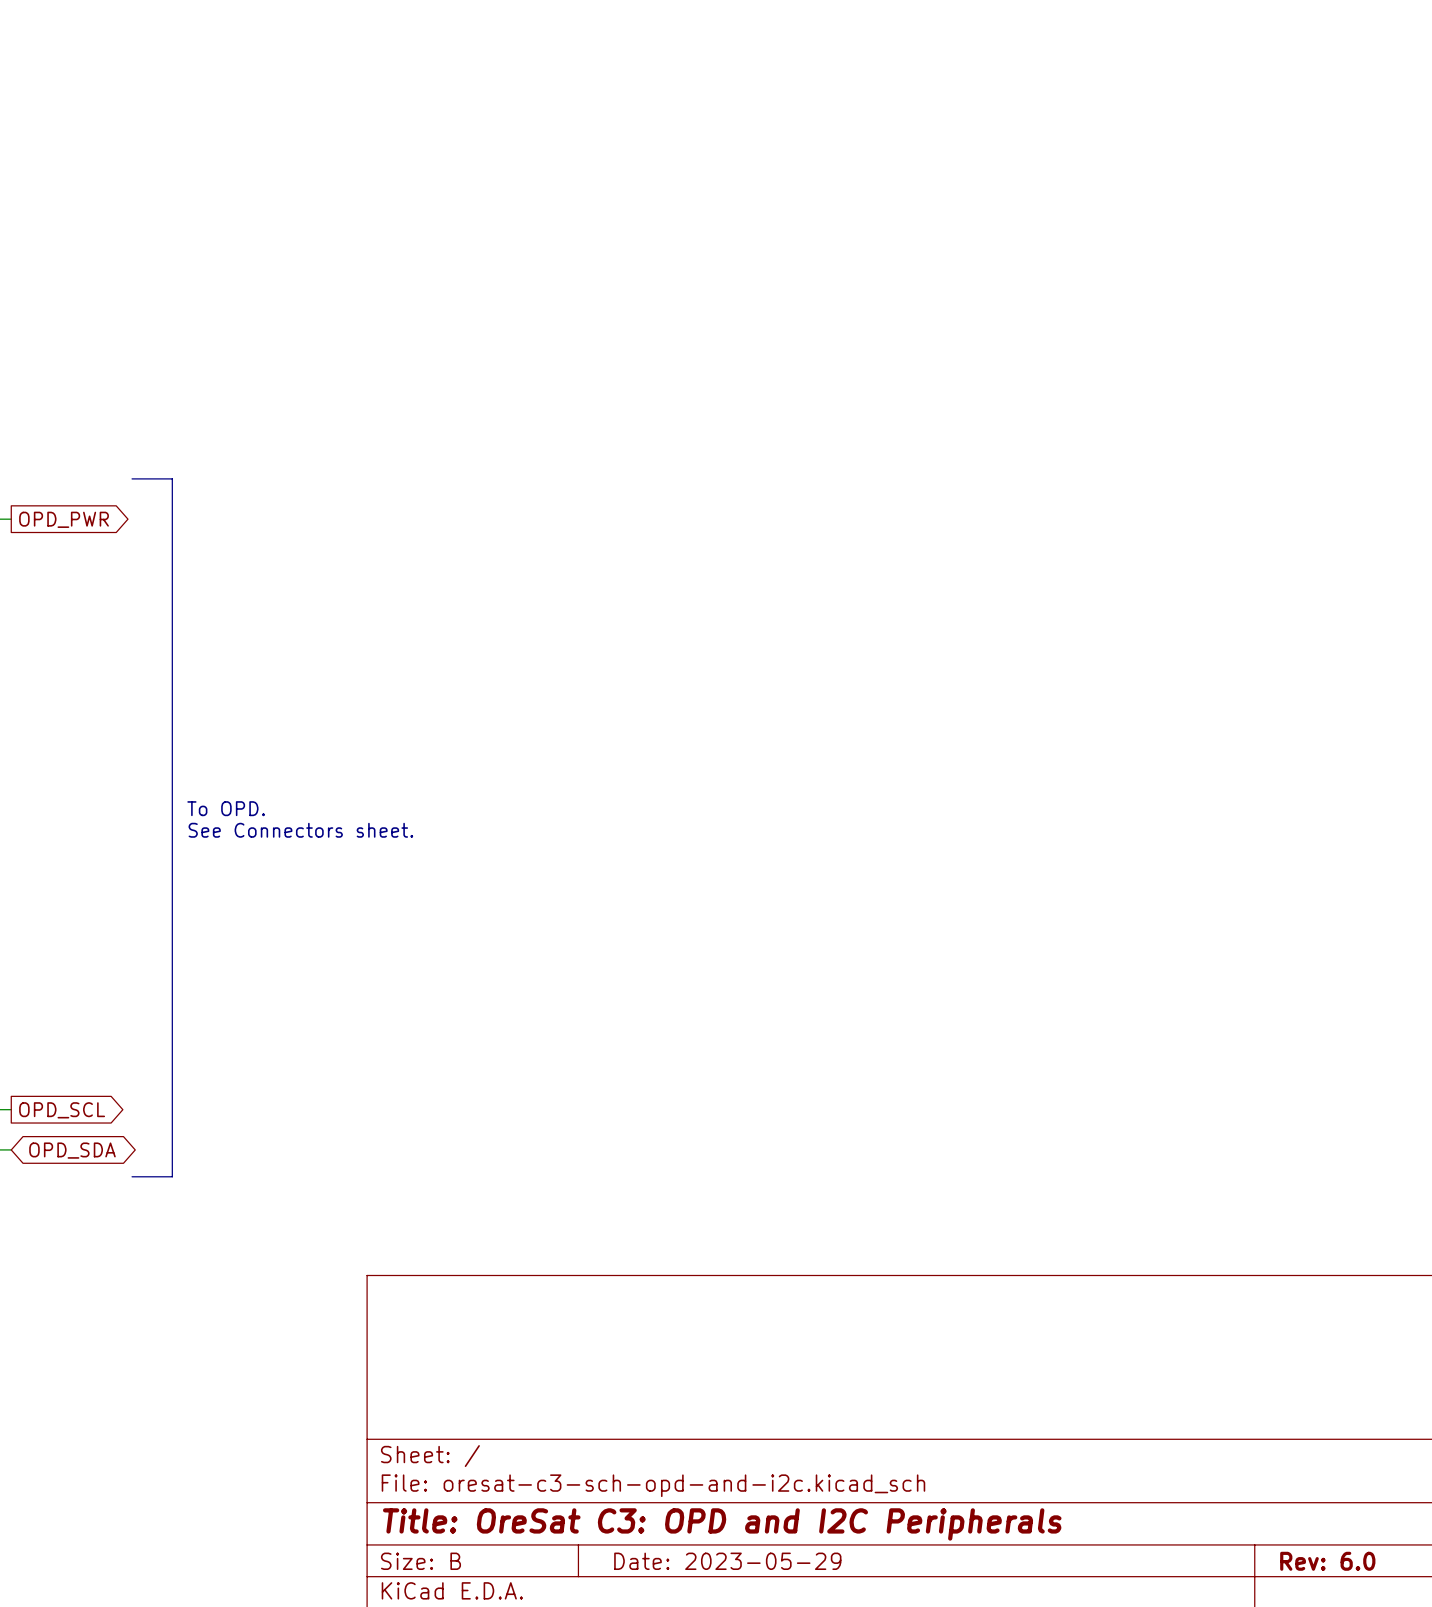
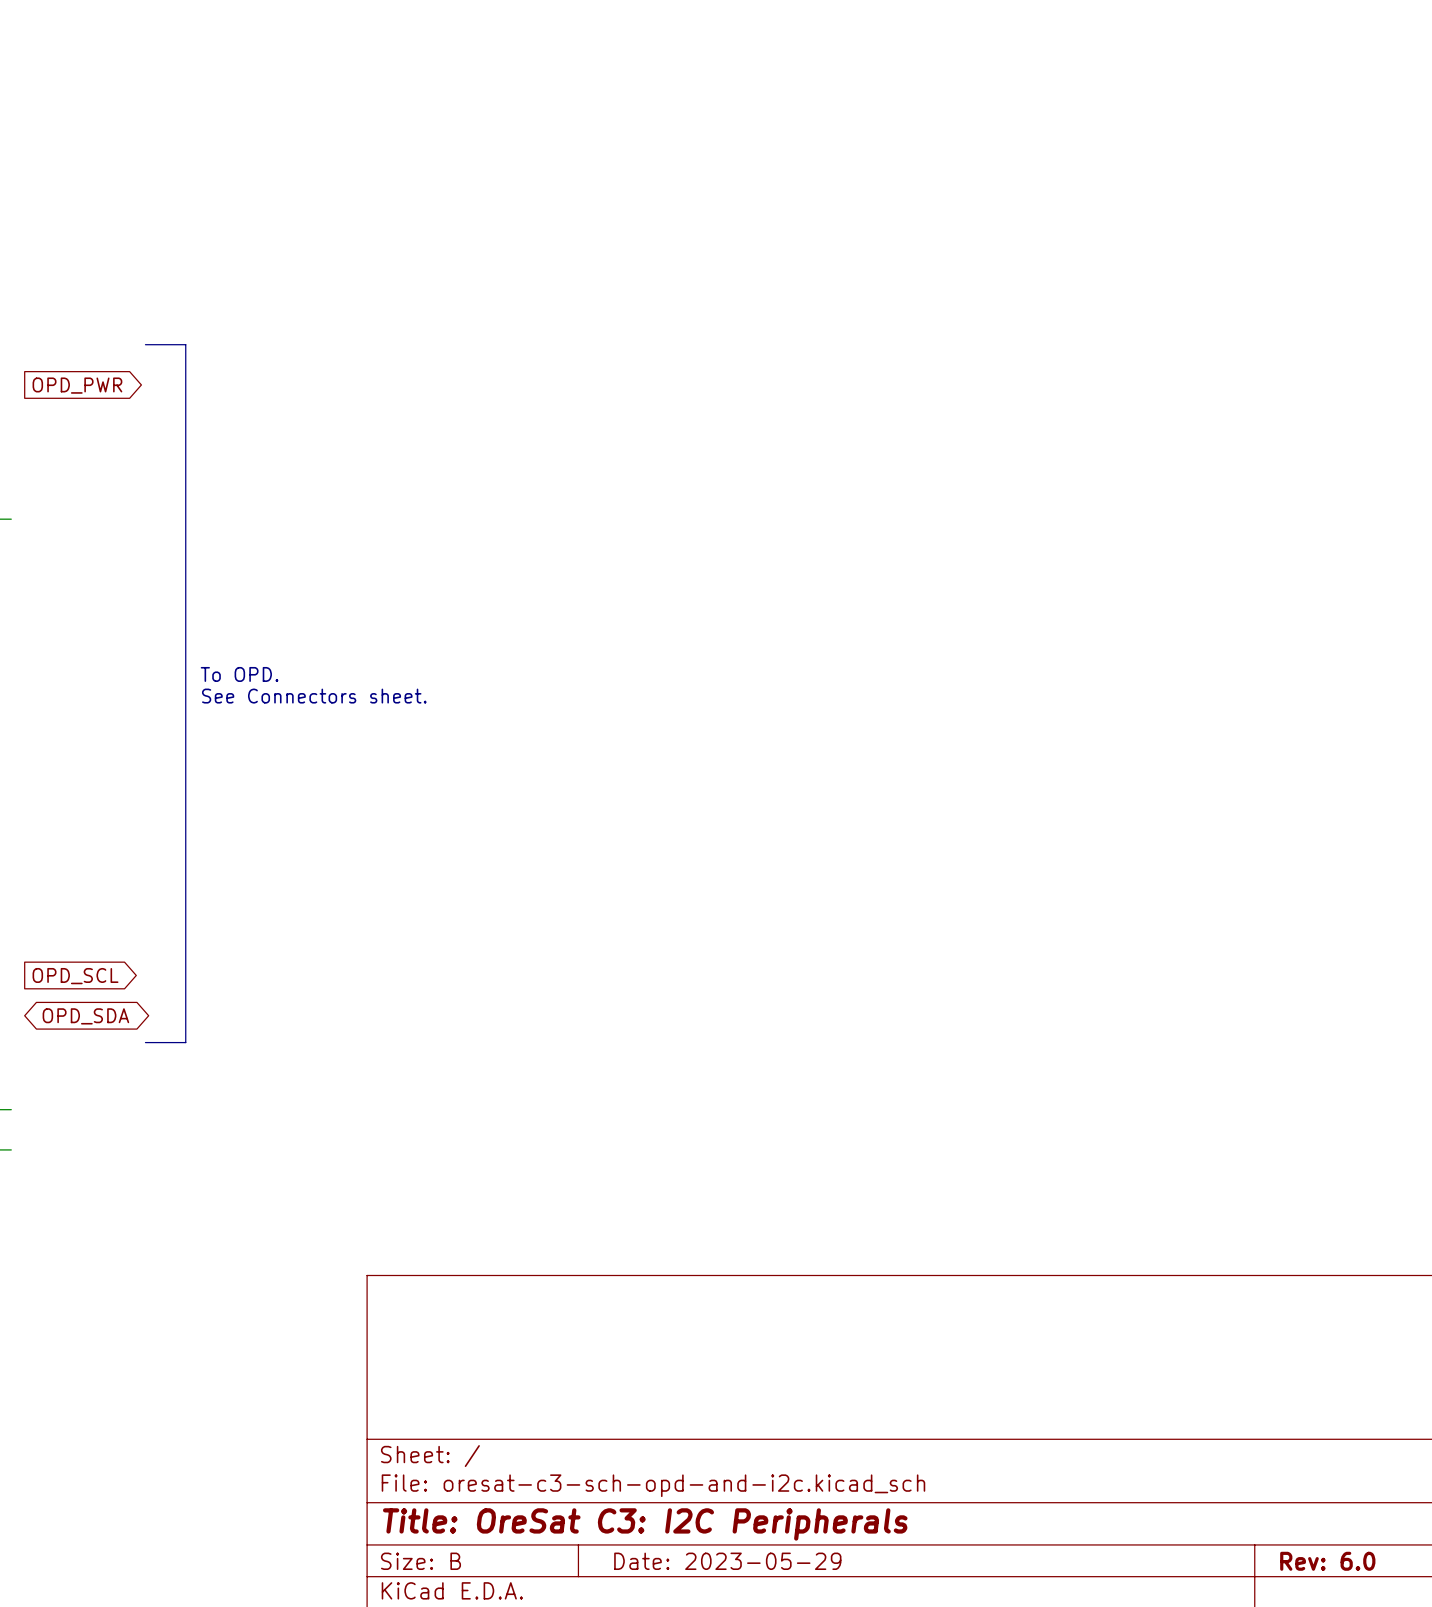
line: (132, 478) (172, 478) (172, 1176) (132, 1176) -> (145, 344) (185, 344) (185, 1042) (145, 1042)
global label position: OPD_PWR (64, 519) -> OPD_PWR (77, 385)
text position: To OPD. (226, 808) -> To OPD. (239, 674)
text position: See Connectors sheet. (300, 830) -> See Connectors sheet. (314, 696)
global label position: OPD_SCL (62, 1110) -> OPD_SCL (75, 976)
global label position: OPD_SDA (72, 1150) -> OPD_SDA (85, 1016)
title block: Title: OreSat C3: OPD and I2C Peripherals (722, 1524) -> Title: OreSat C3: I2C Peripherals (645, 1524)

